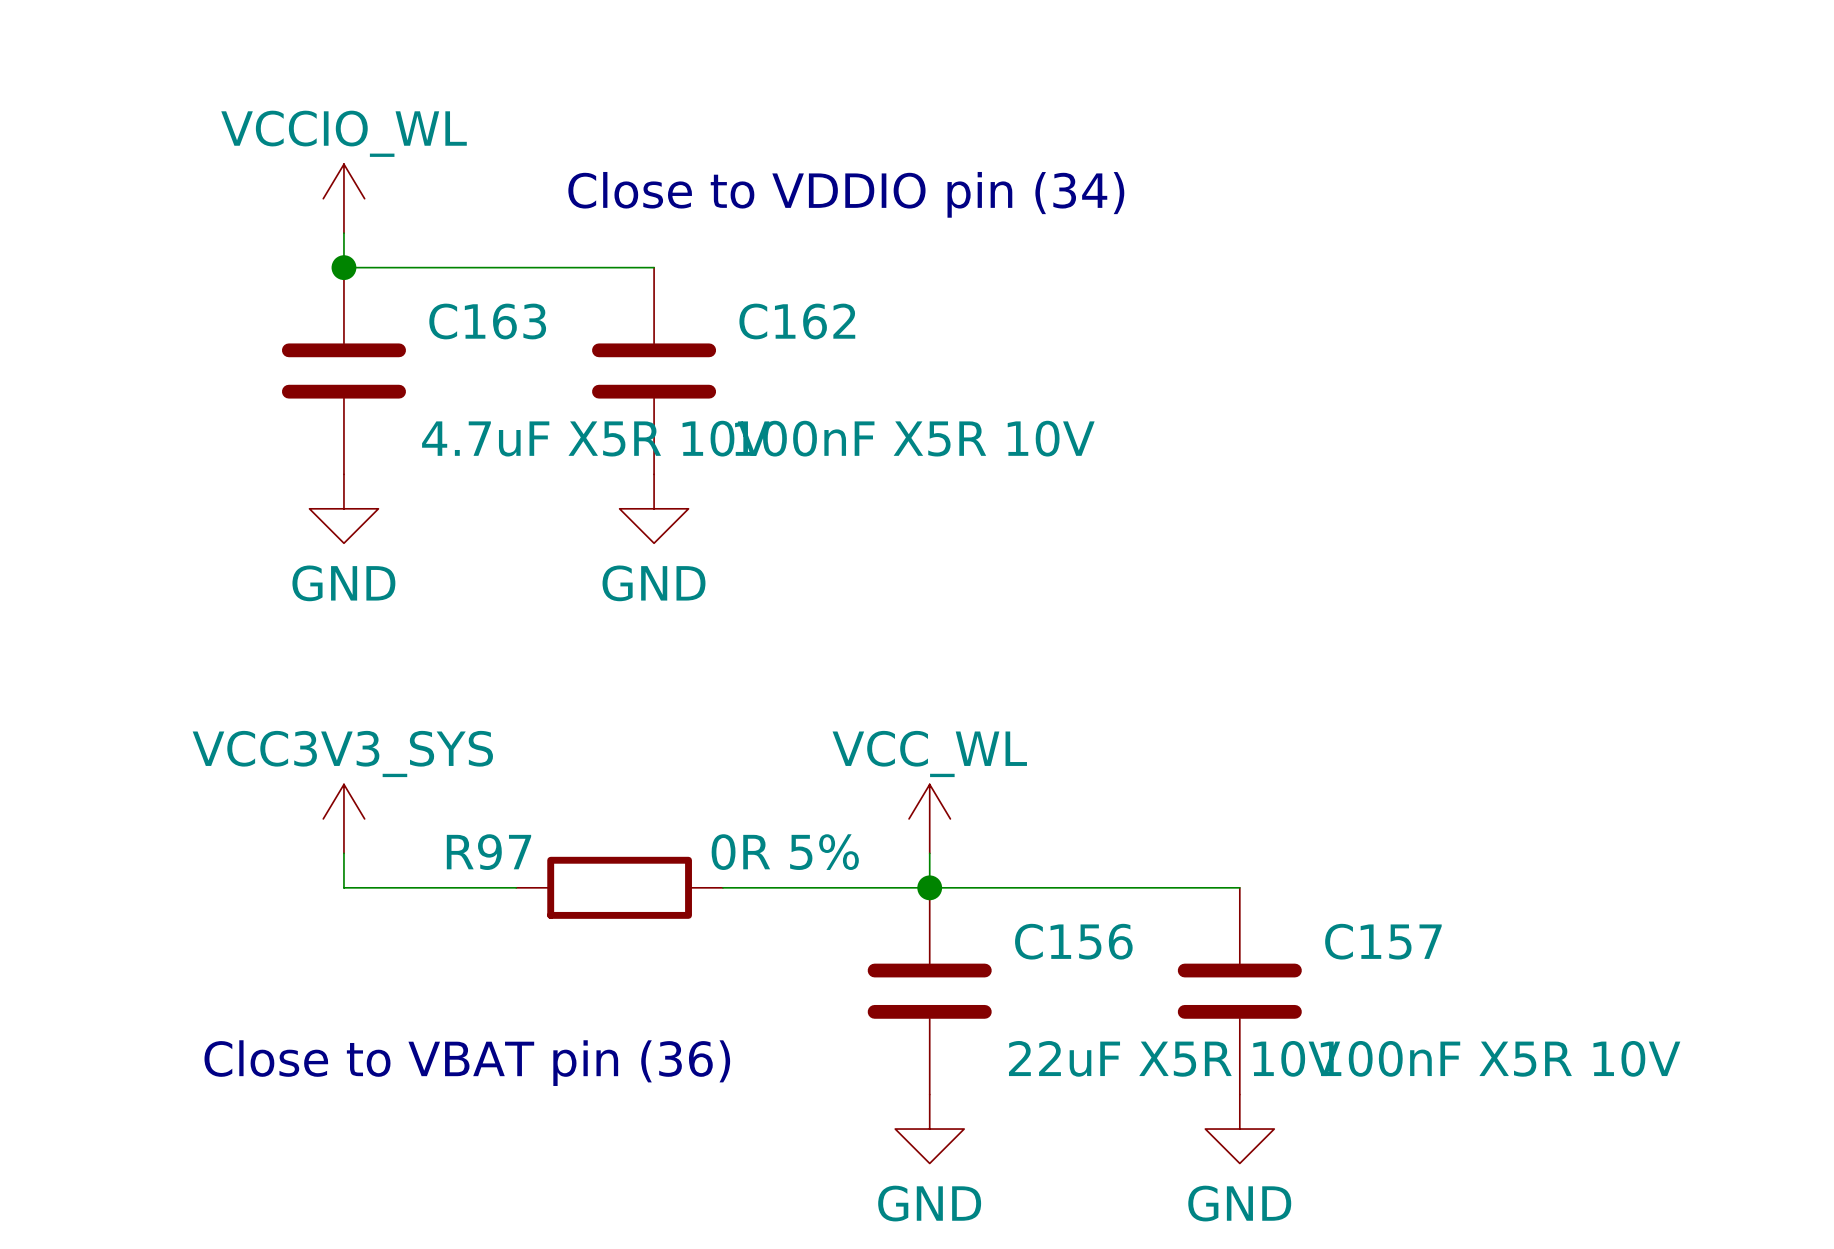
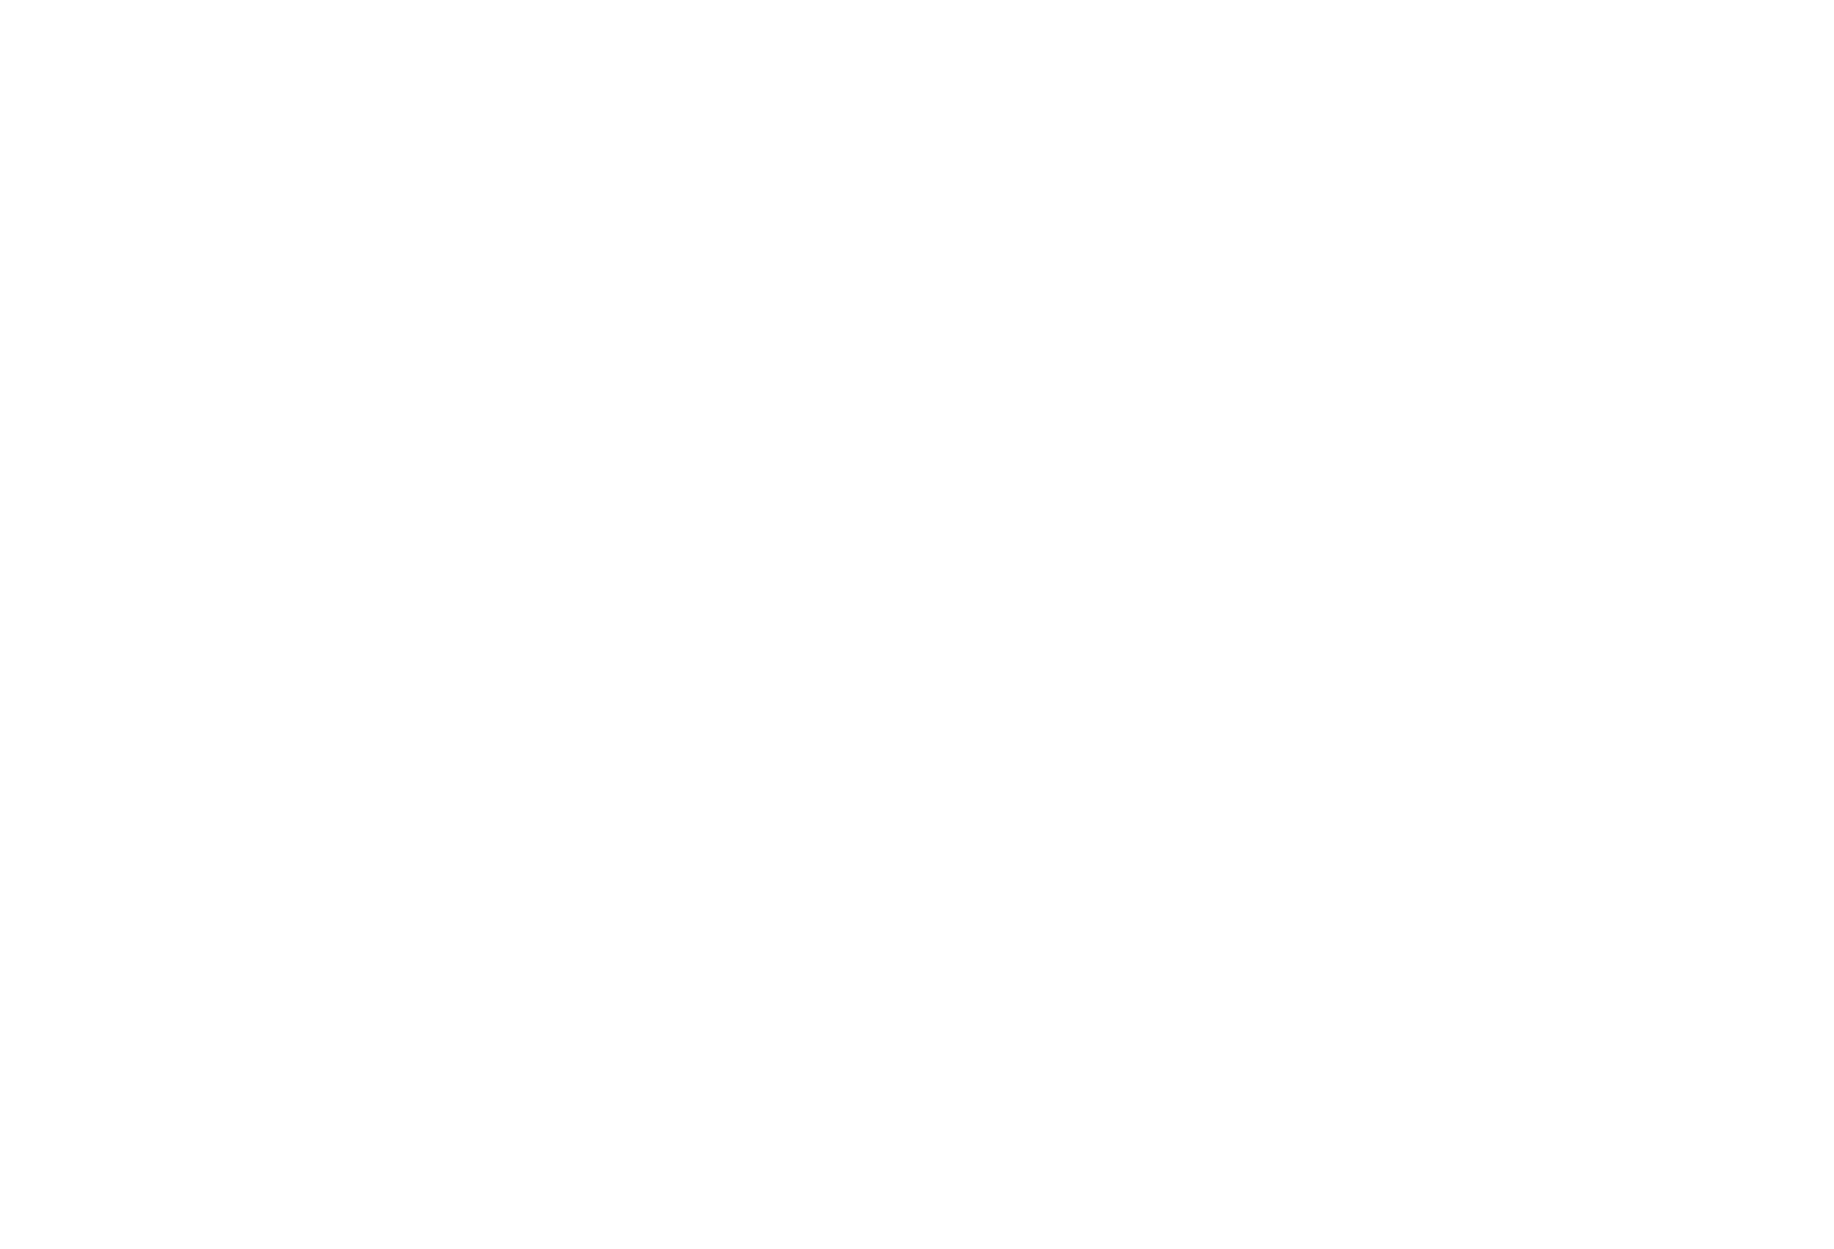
text: Close to VDDIO pin (34) (846, 194) -> none
power symbol: VCCIO_WL (343, 198) -> none
wire: (343, 233) (343, 267) (654, 267) -> none
junction: (343, 267) -> none
C163: 4.7uF X5R 10V (343, 371) -> none
C162: 100nF X5R 10V (654, 371) -> none
power symbol: GND (343, 508) -> none
power symbol: GND (654, 508) -> none
power symbol: VCC3V3_SYS (343, 818) -> none
power symbol: VCC_WL (929, 818) -> none
wire: (343, 853) (343, 887) (516, 887) -> none
wire: (929, 853) (929, 887) -> none
R97: 0R 5% (619, 887) -> none
wire: (722, 887) (1239, 887) -> none
junction: (929, 887) -> none
C156: 22uF X5R 10V (929, 991) -> none
C157: 100nF X5R 10V (1239, 991) -> none
text: Close to VBAT pin (36) (467, 1063) -> none
power symbol: GND (929, 1129) -> none
power symbol: GND (1239, 1129) -> none

